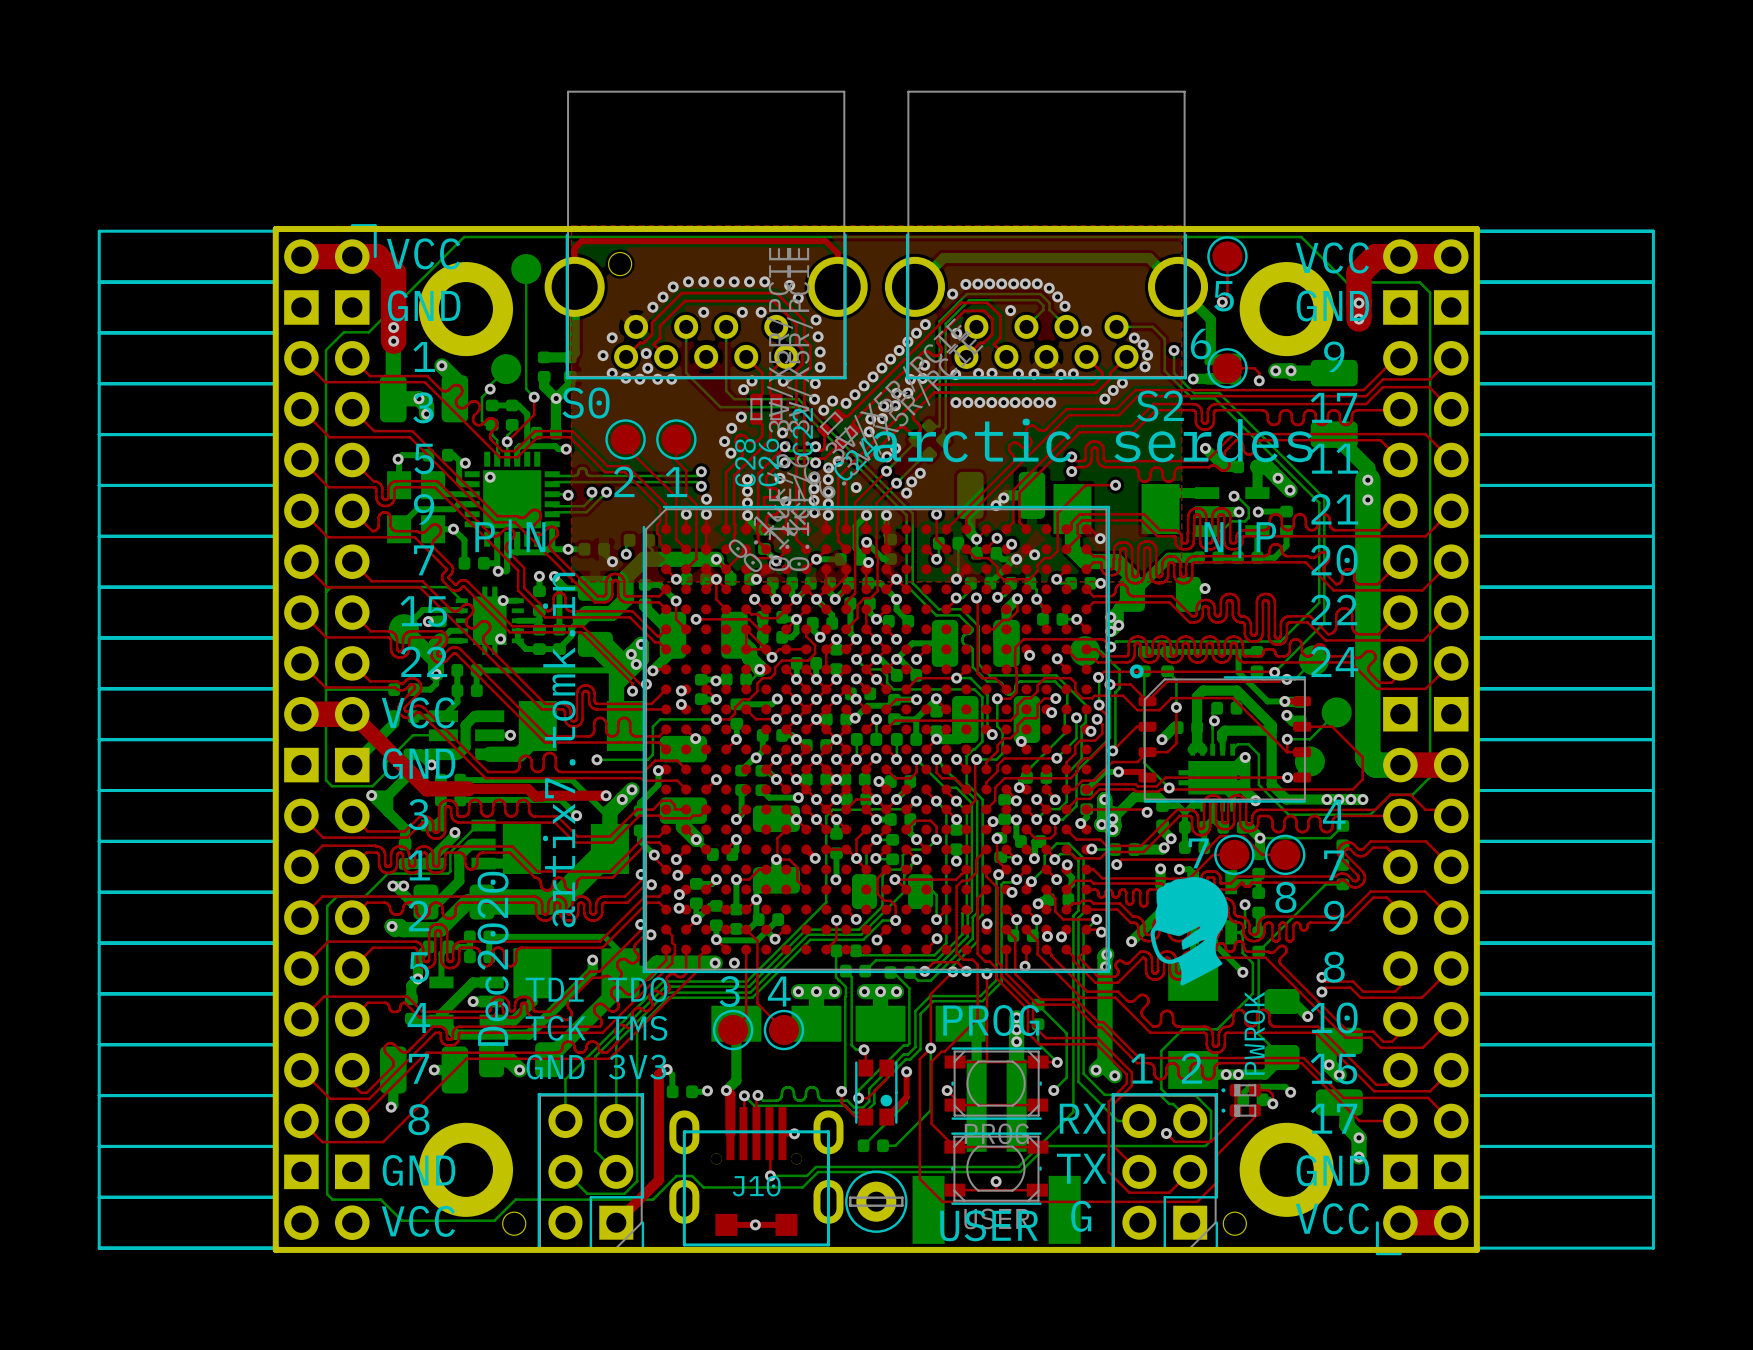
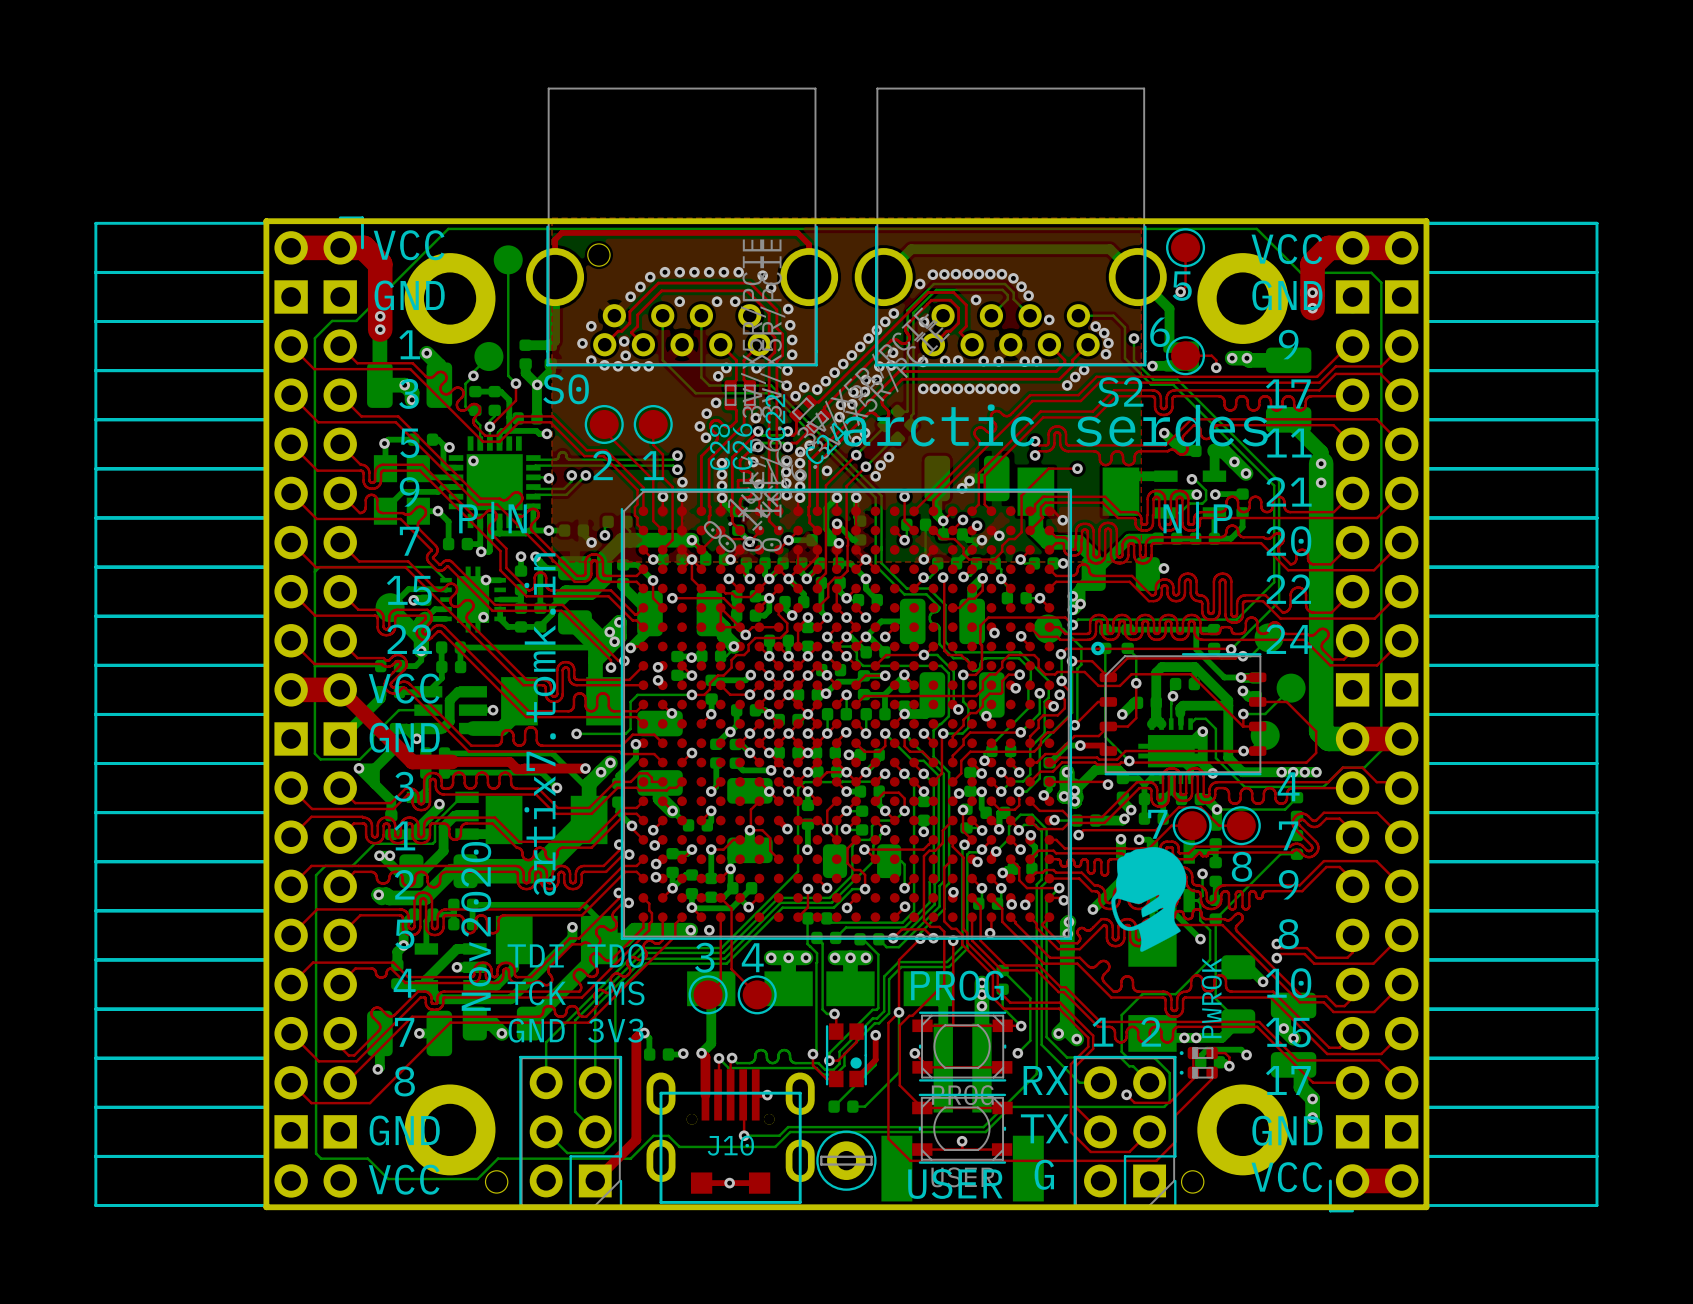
text: Dec2020 (493, 958) -> Nov2020 (476, 926)

